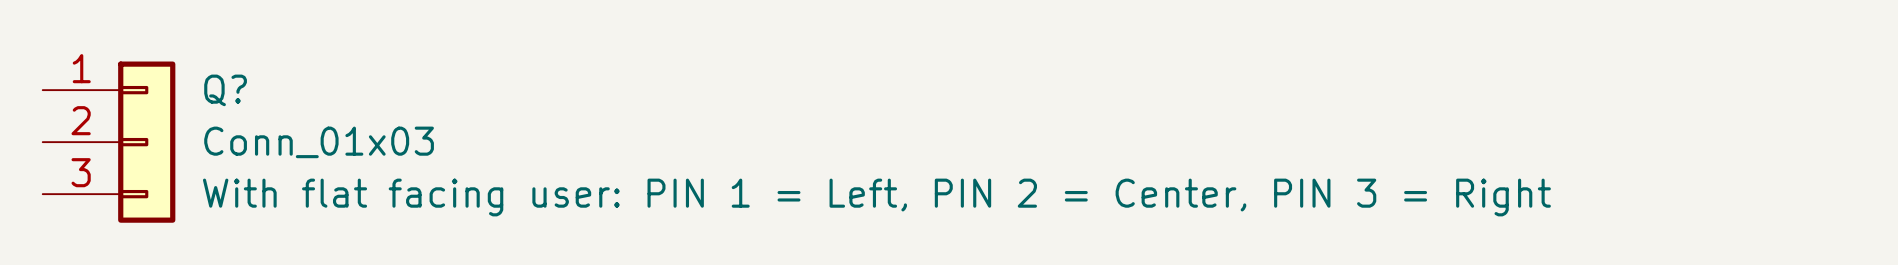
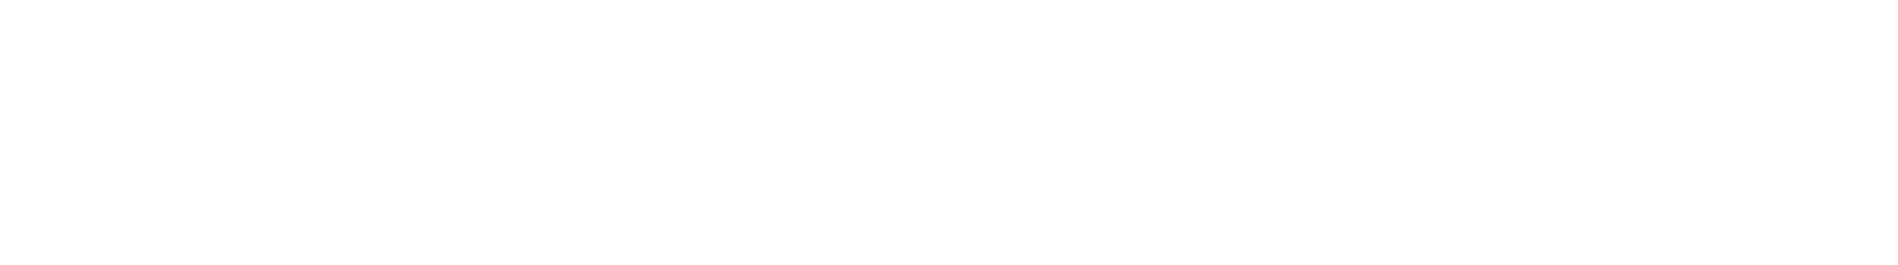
Q?: Conn_01x03 (109, 142) -> none

